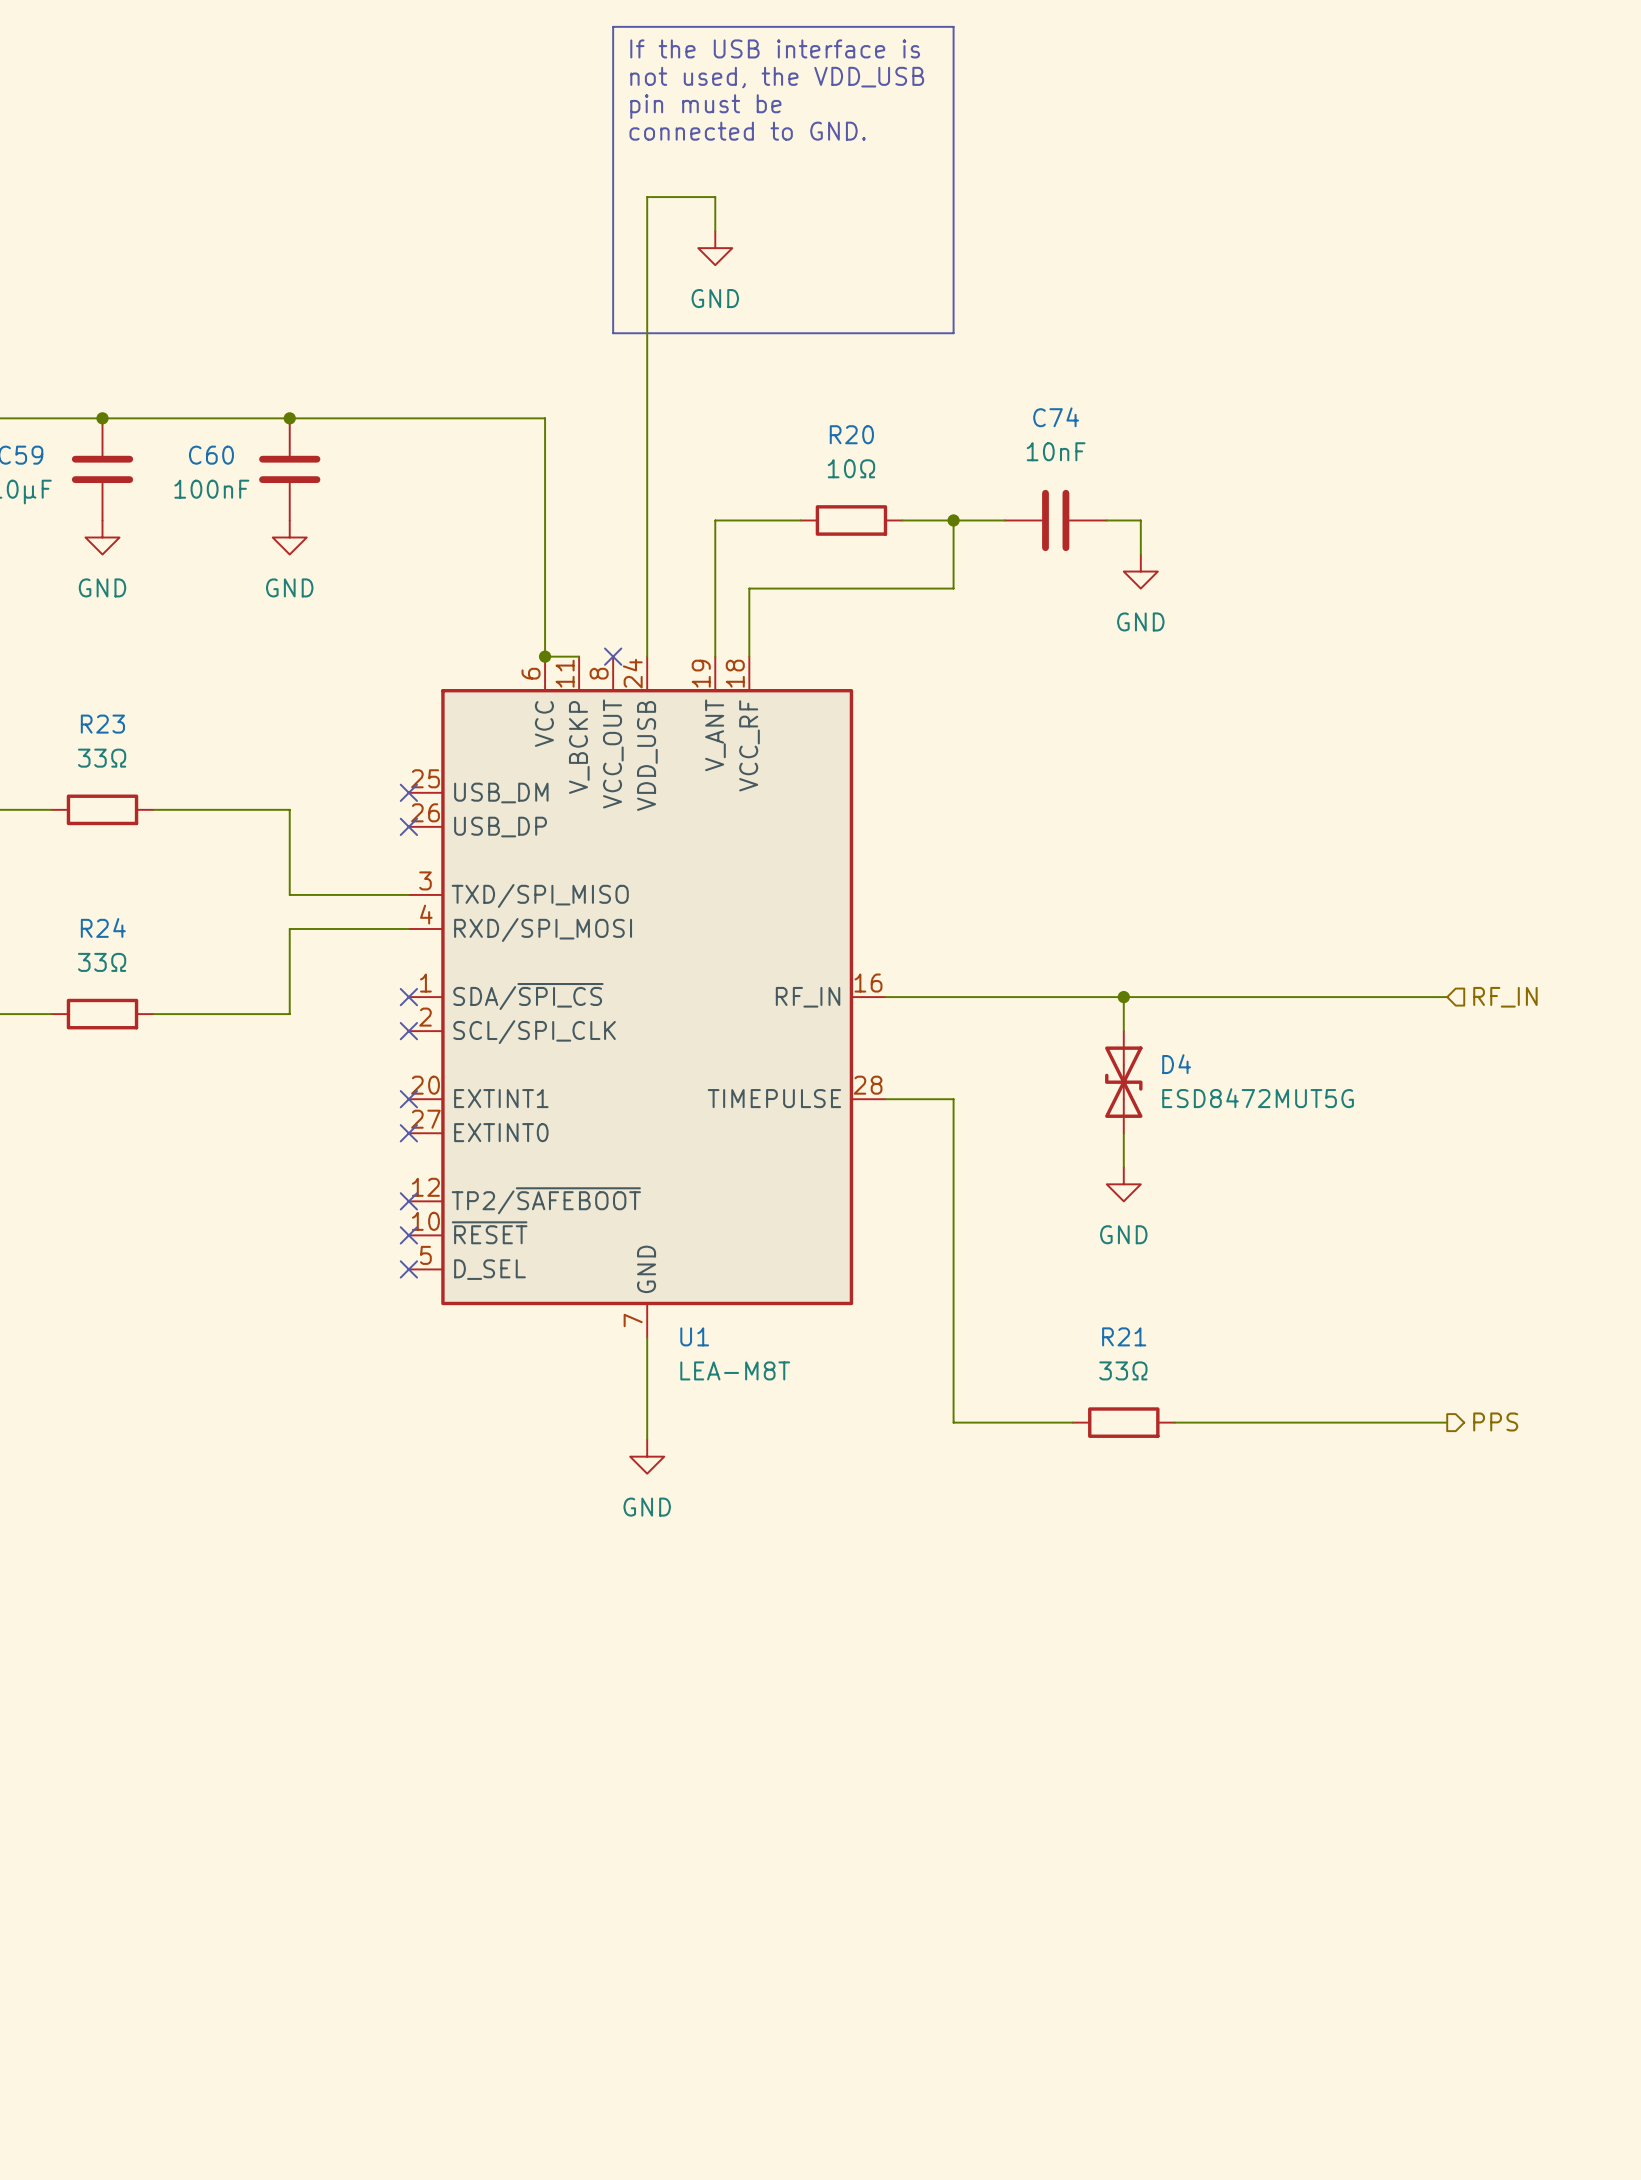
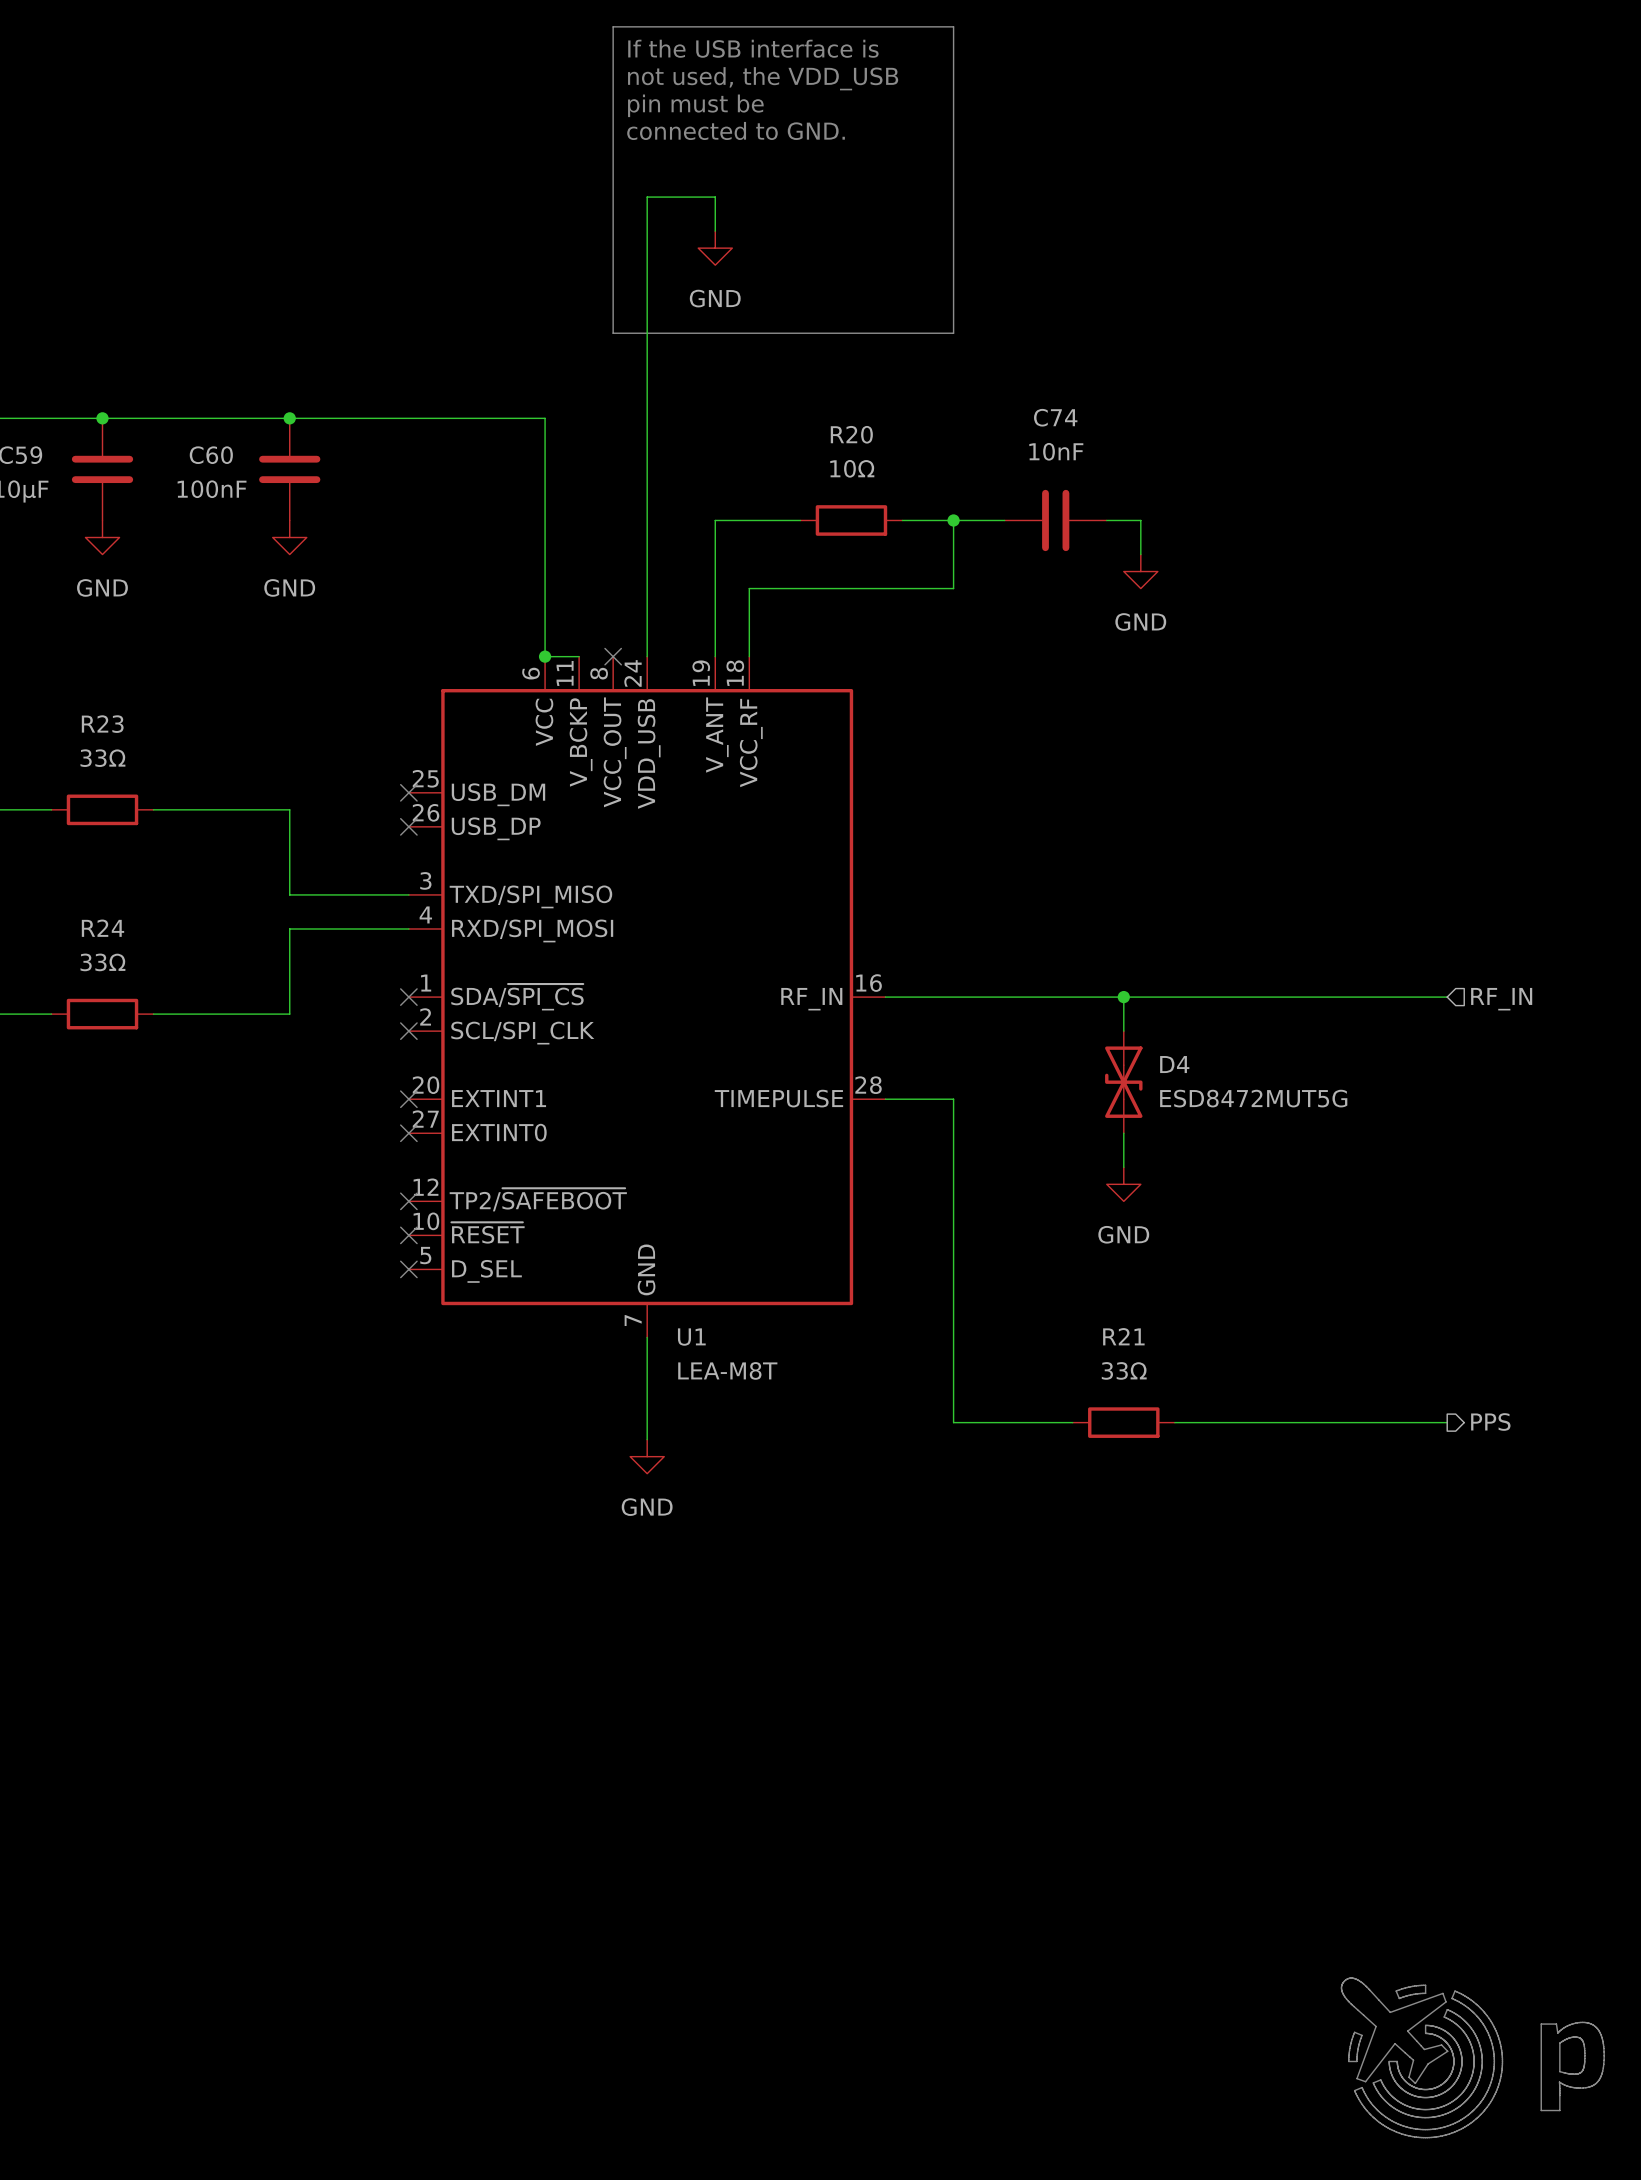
line: none -> (1350, 1978) (1342, 1984) (1343, 1994) (1376, 2026) (1356, 2078) (1365, 2081) (1395, 2043) (1413, 2060) (1408, 2077) (1415, 2083) (1428, 2063) (1447, 2051) (1441, 2044) (1424, 2049) (1407, 2031) (1446, 2001) (1442, 1993) (1390, 2012) (1364, 1984) (1356, 1979) (1350, 1978)
line: none -> (1423, 1985) (1408, 1987) (1396, 1991) (1399, 1998) (1425, 1993) (1425, 1985) (1423, 1985)
line: none -> (1455, 1991) (1451, 1998) (1475, 2014) (1484, 2026) (1490, 2040) (1494, 2064) (1488, 2089) (1477, 2105) (1463, 2118) (1445, 2126) (1425, 2129) (1408, 2127) (1391, 2120) (1374, 2107) (1362, 2087) (1354, 2090) (1371, 2115) (1394, 2131) (1423, 2137) (1453, 2132) (1478, 2116) (1495, 2092) (1500, 2078) (1502, 2061) (1496, 2032) (1479, 2007) (1455, 1991)
line: none -> (1447, 2009) (1444, 2017) (1460, 2028) (1471, 2046) (1474, 2063) (1469, 2080) (1462, 2092) (1452, 2101) (1440, 2107) (1426, 2109) (1412, 2107) (1398, 2101) (1388, 2091) (1380, 2079) (1373, 2082) (1385, 2101) (1402, 2112) (1424, 2117) (1445, 2113) (1464, 2102) (1477, 2084) (1482, 2062) (1478, 2041) (1466, 2022) (1447, 2009)
line: none -> (1580, 2022) (1568, 2025) (1557, 2033) (1556, 2024) (1541, 2024) (1541, 2110) (1559, 2110) (1559, 2082) (1571, 2087) (1585, 2087) (1594, 2084) (1600, 2076) (1604, 2055) (1601, 2035) (1593, 2025) (1580, 2022)
line: none -> (1425, 2025) (1425, 2033) (1441, 2038) (1452, 2052) (1453, 2067) (1445, 2081) (1431, 2088) (1416, 2087) (1402, 2077) (1397, 2061) (1389, 2061) (1391, 2075) (1399, 2087) (1411, 2094) (1425, 2097) (1439, 2094) (1451, 2087) (1459, 2075) (1462, 2061) (1459, 2047) (1451, 2035) (1439, 2028) (1425, 2025)
line: none -> (1354, 2032) (1350, 2046) (1348, 2061) (1356, 2061) (1362, 2035) (1354, 2032)
line: none -> (1573, 2037) (1581, 2039) (1584, 2048) (1583, 2068) (1580, 2072) (1576, 2074) (1559, 2071) (1559, 2043) (1573, 2037)

